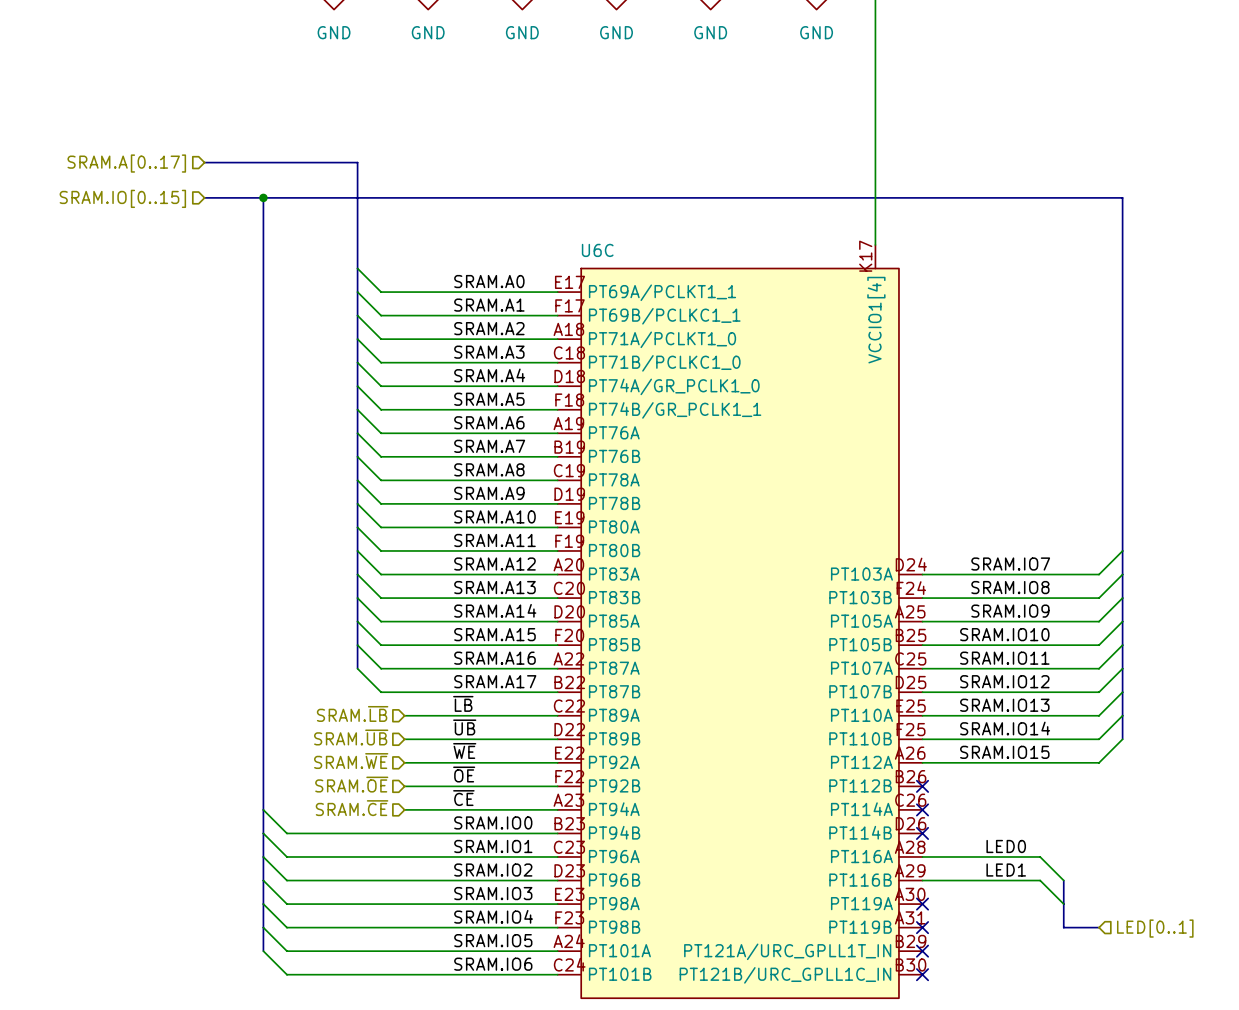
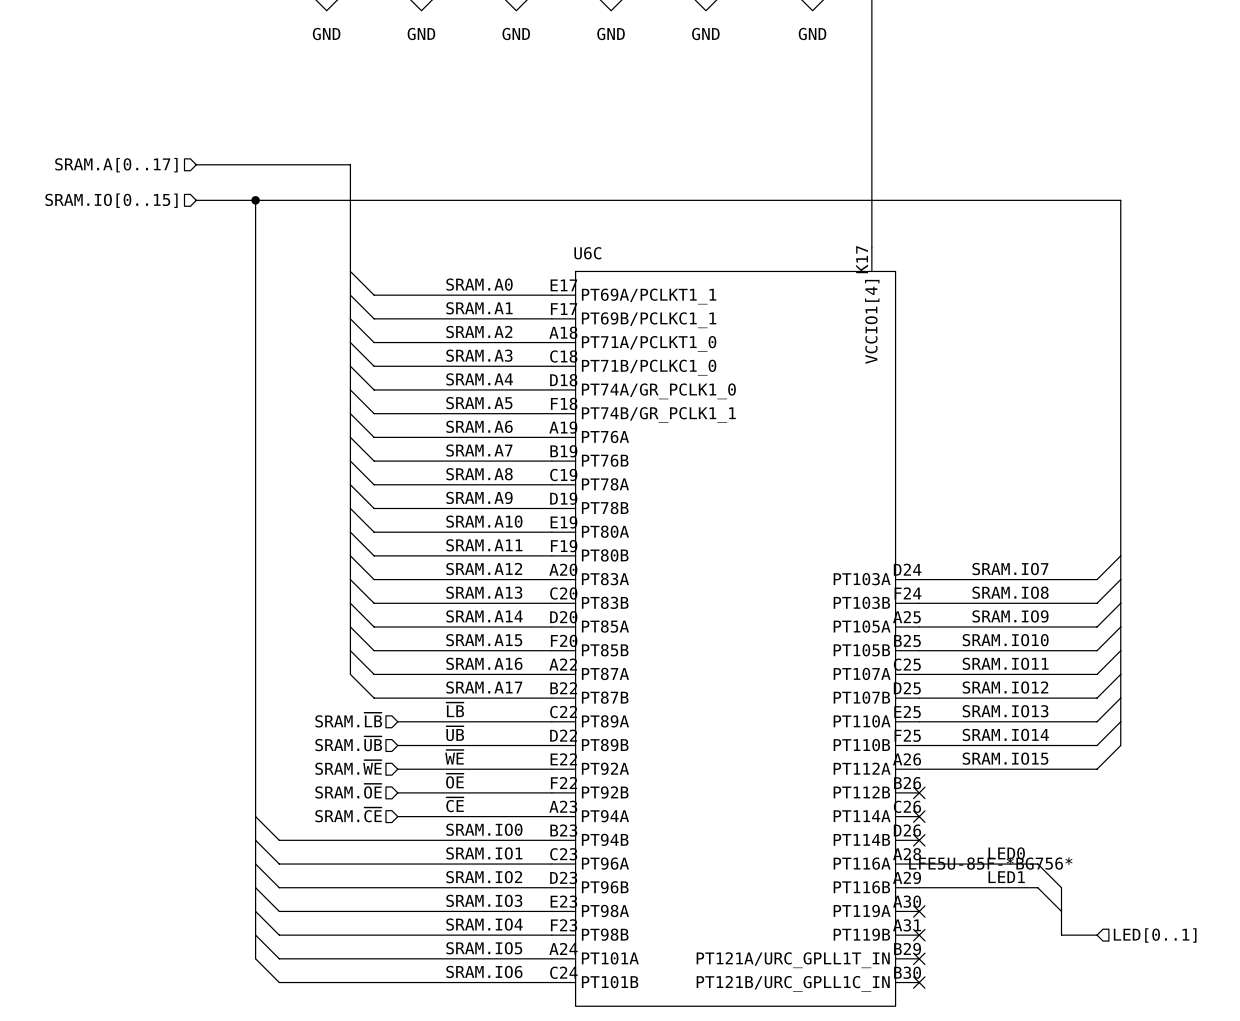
U6C value: none -> LFE5U-85F-*BG756* (990, 863)

